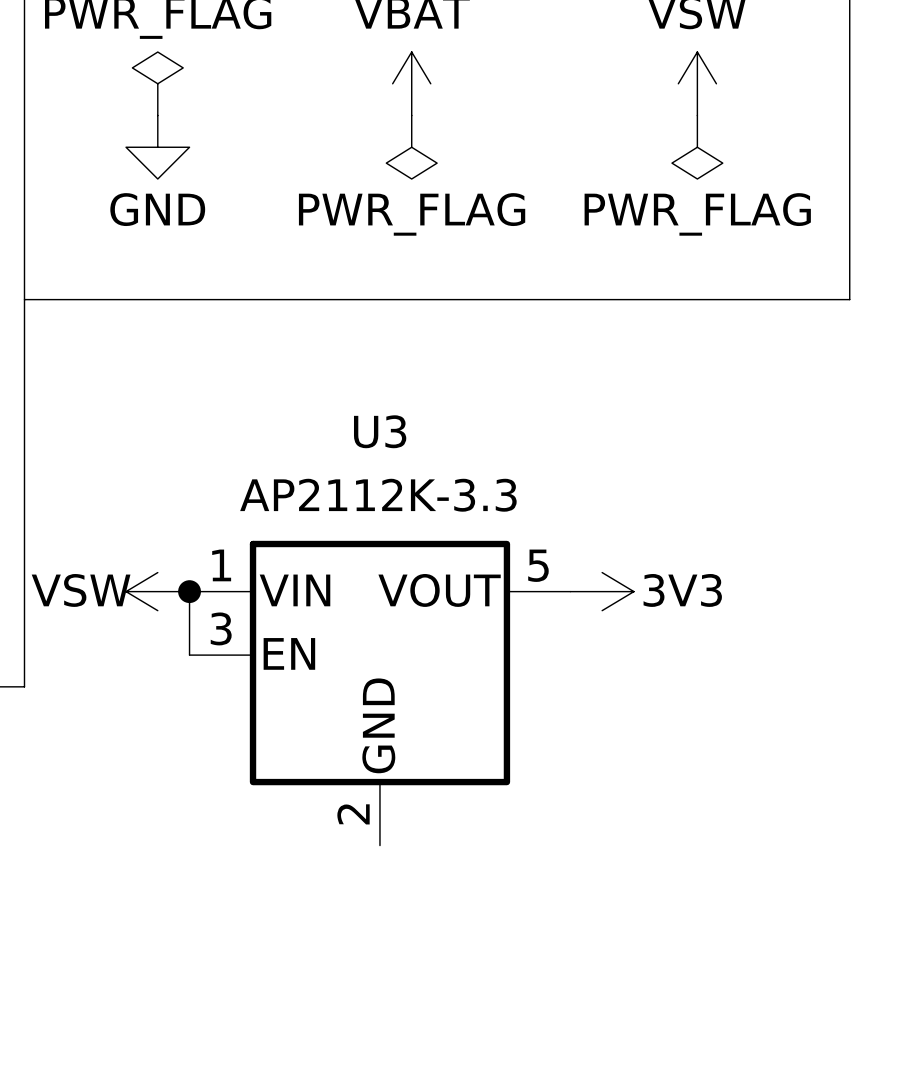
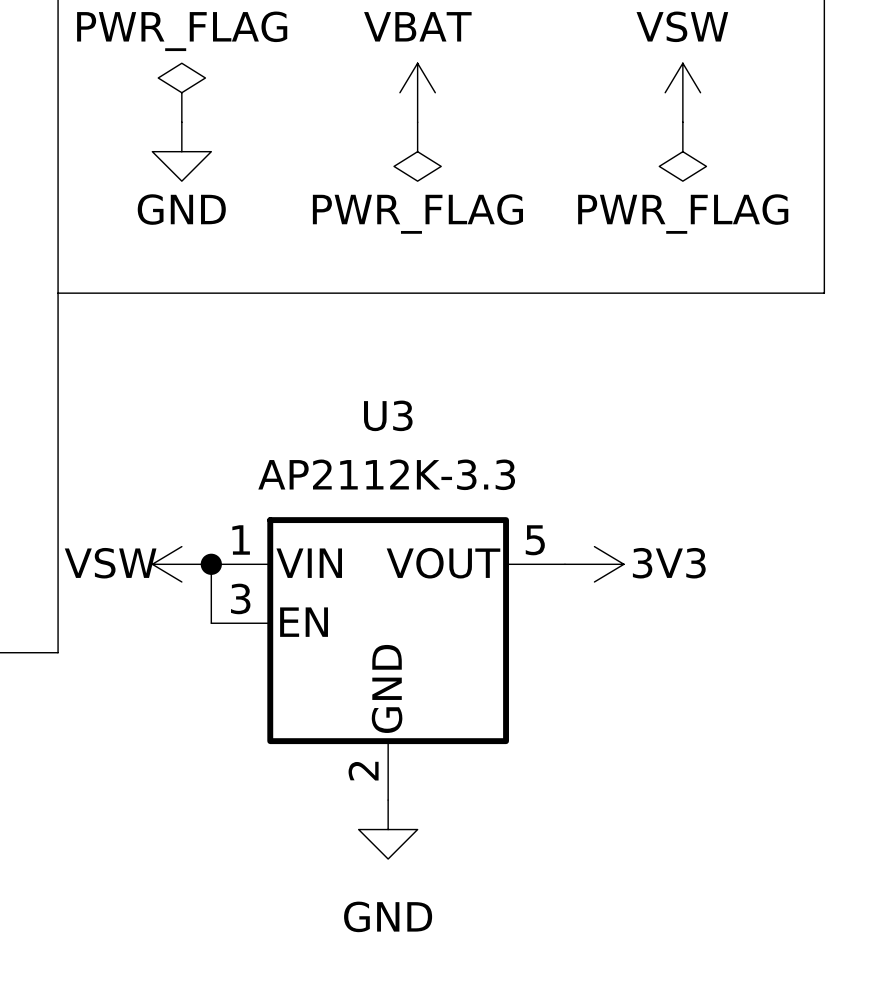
power symbol: none -> GND (388, 829)

